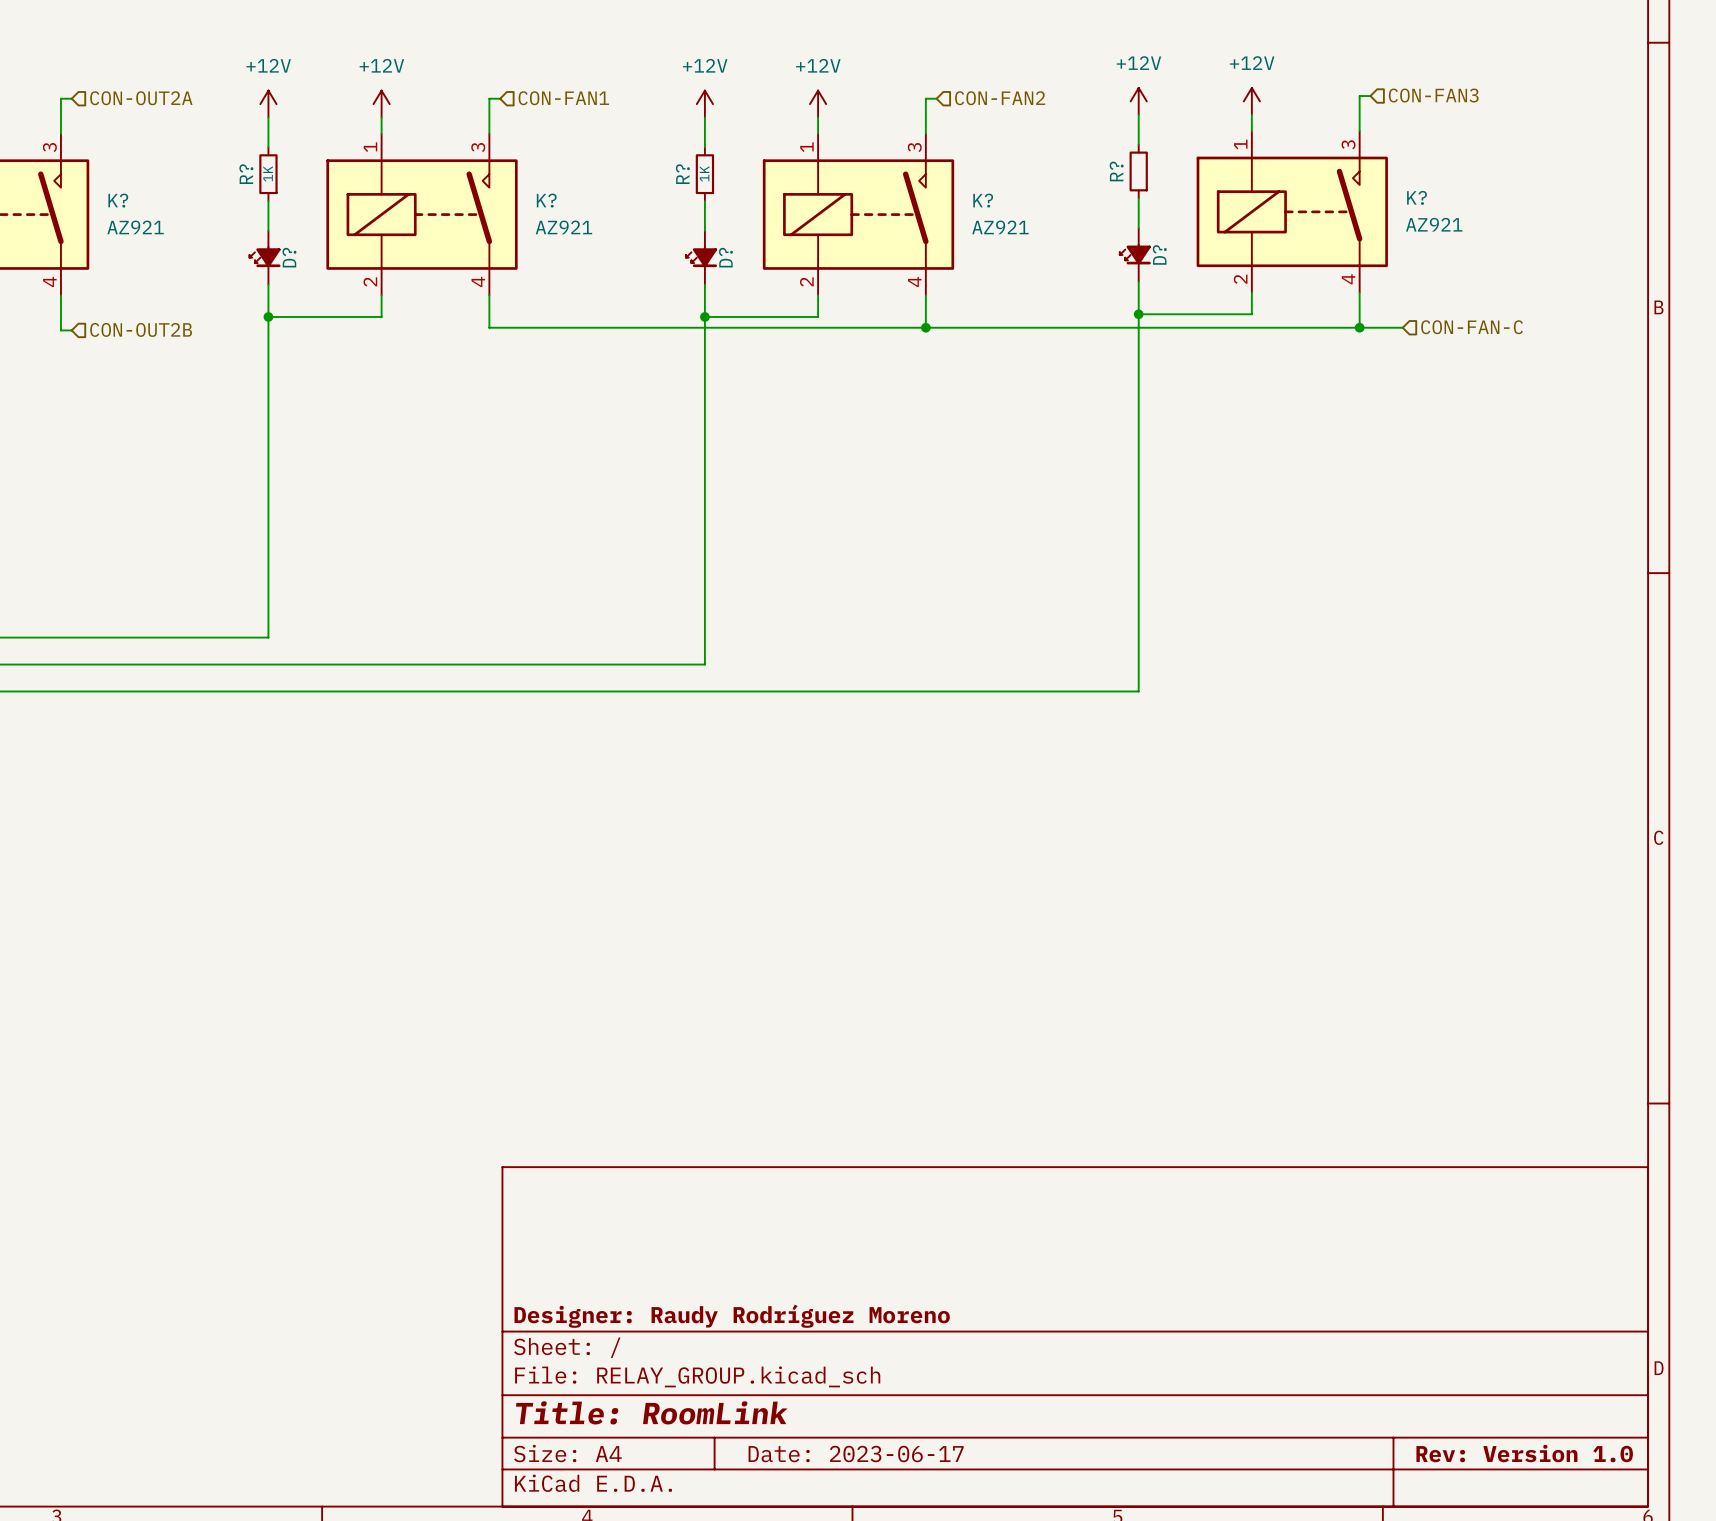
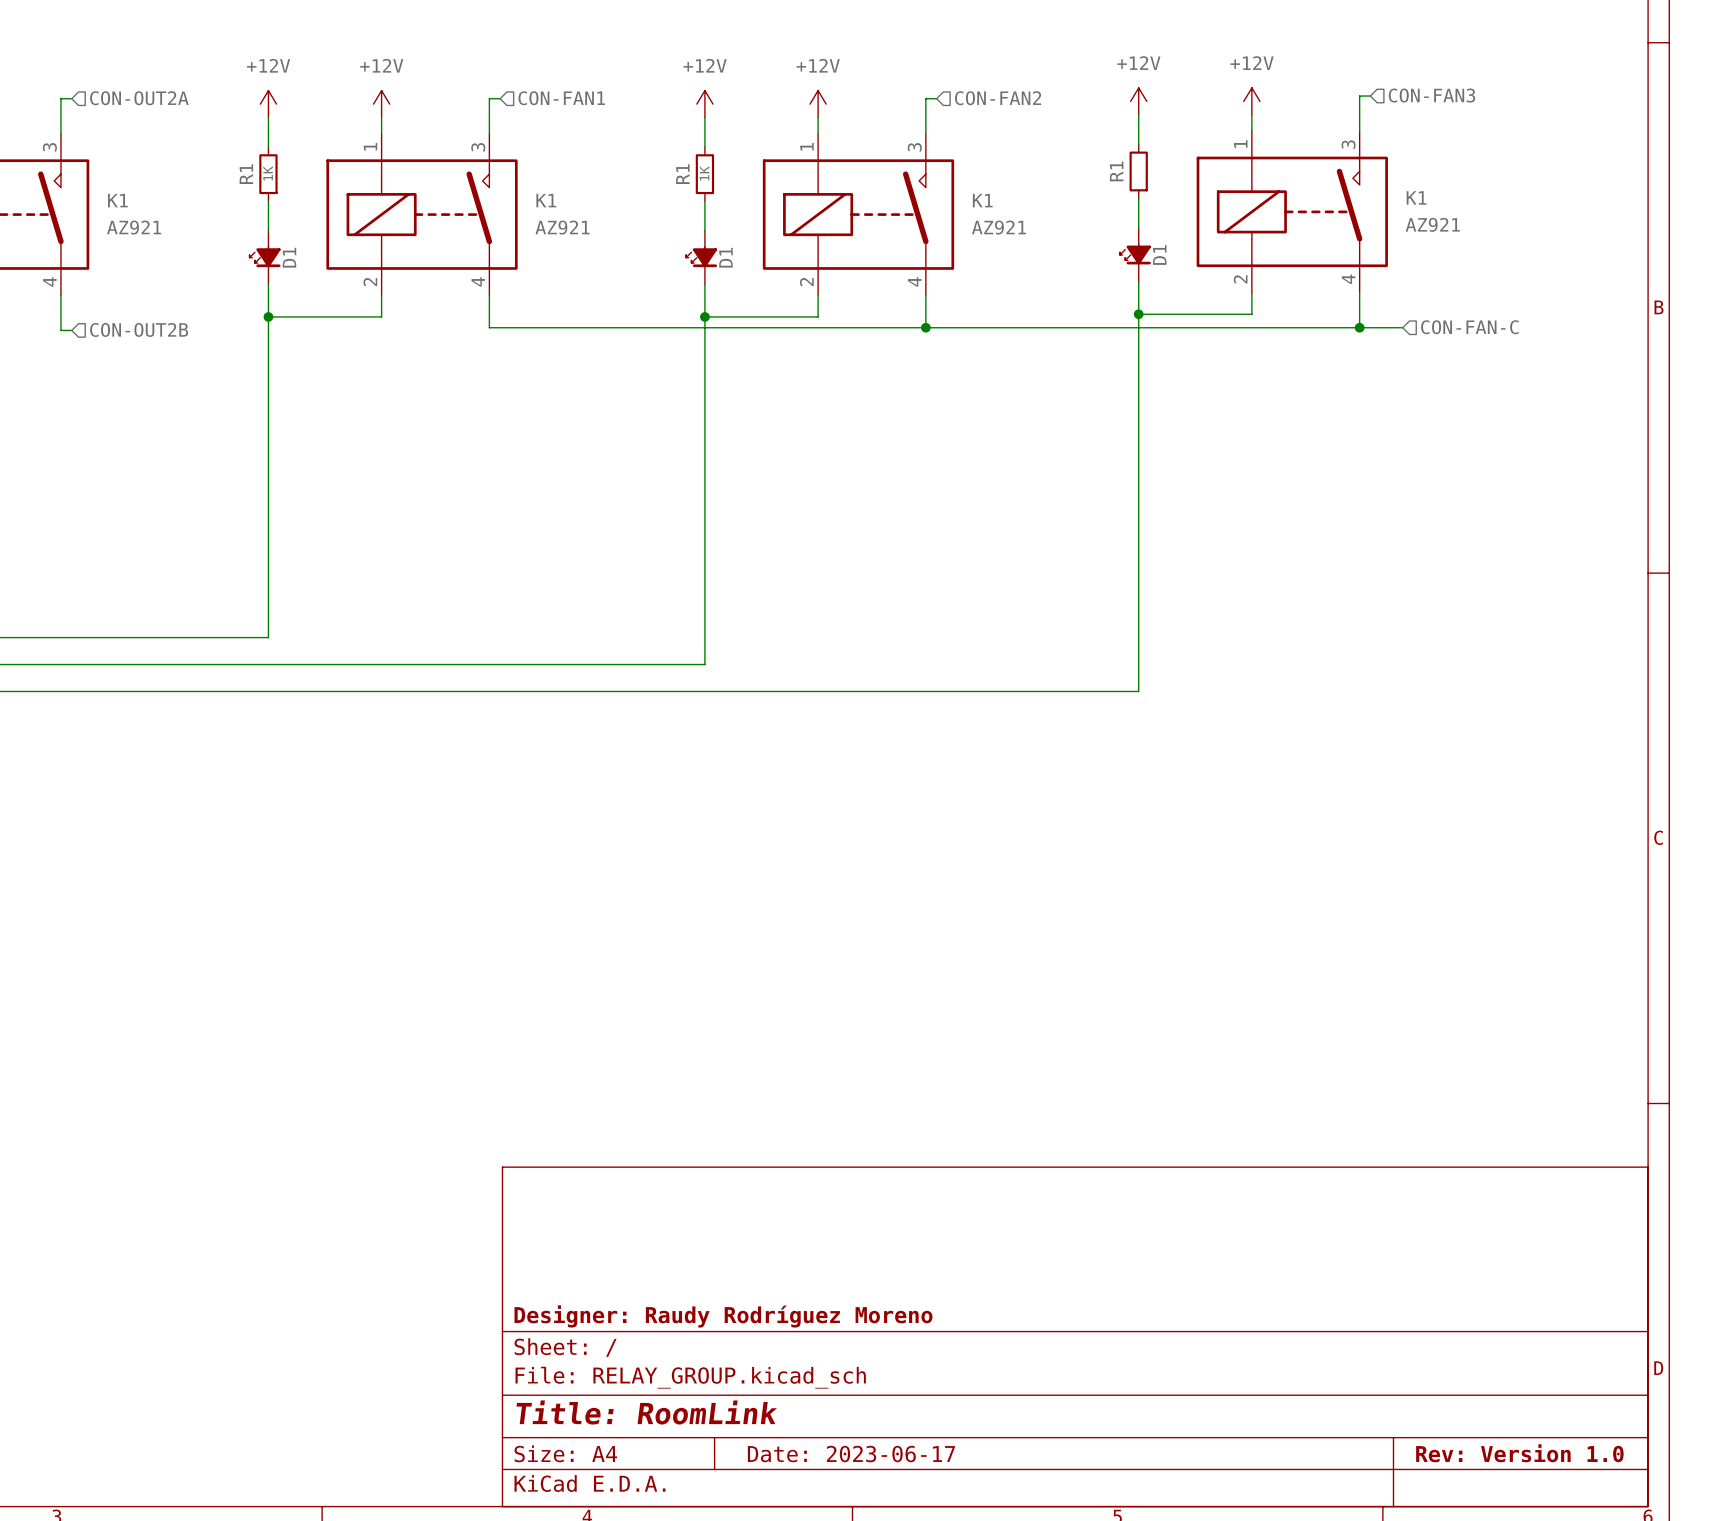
R? name: R? (1116, 171) -> R1 (1116, 171)
R? name: R? (246, 174) -> R1 (246, 174)
R? name: R? (682, 174) -> R1 (682, 174)
K? name: K? (1416, 197) -> K1 (1416, 197)
K? name: K? (118, 200) -> K1 (117, 200)
K? name: K? (546, 200) -> K1 (546, 200)
K? name: K? (983, 200) -> K1 (982, 200)
D? name: D? (1159, 254) -> D1 (1159, 255)
D? name: D? (289, 257) -> D1 (289, 257)
D? name: D? (725, 257) -> D1 (725, 257)

